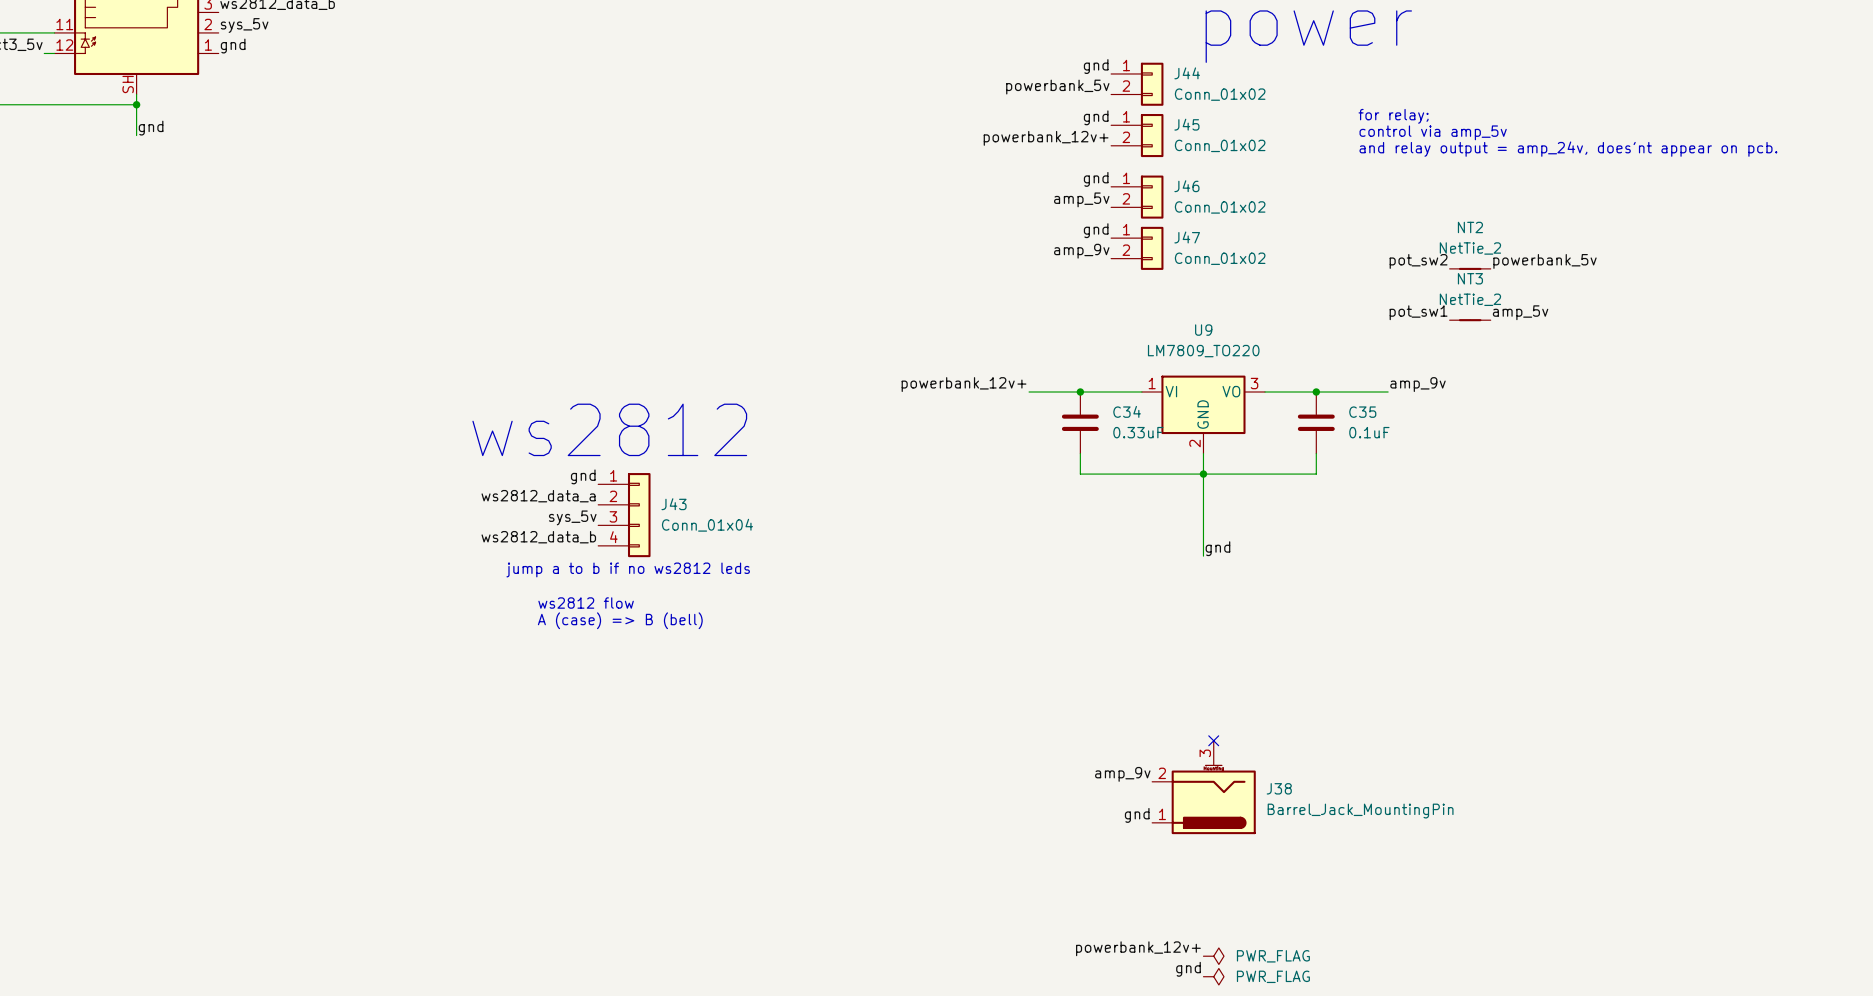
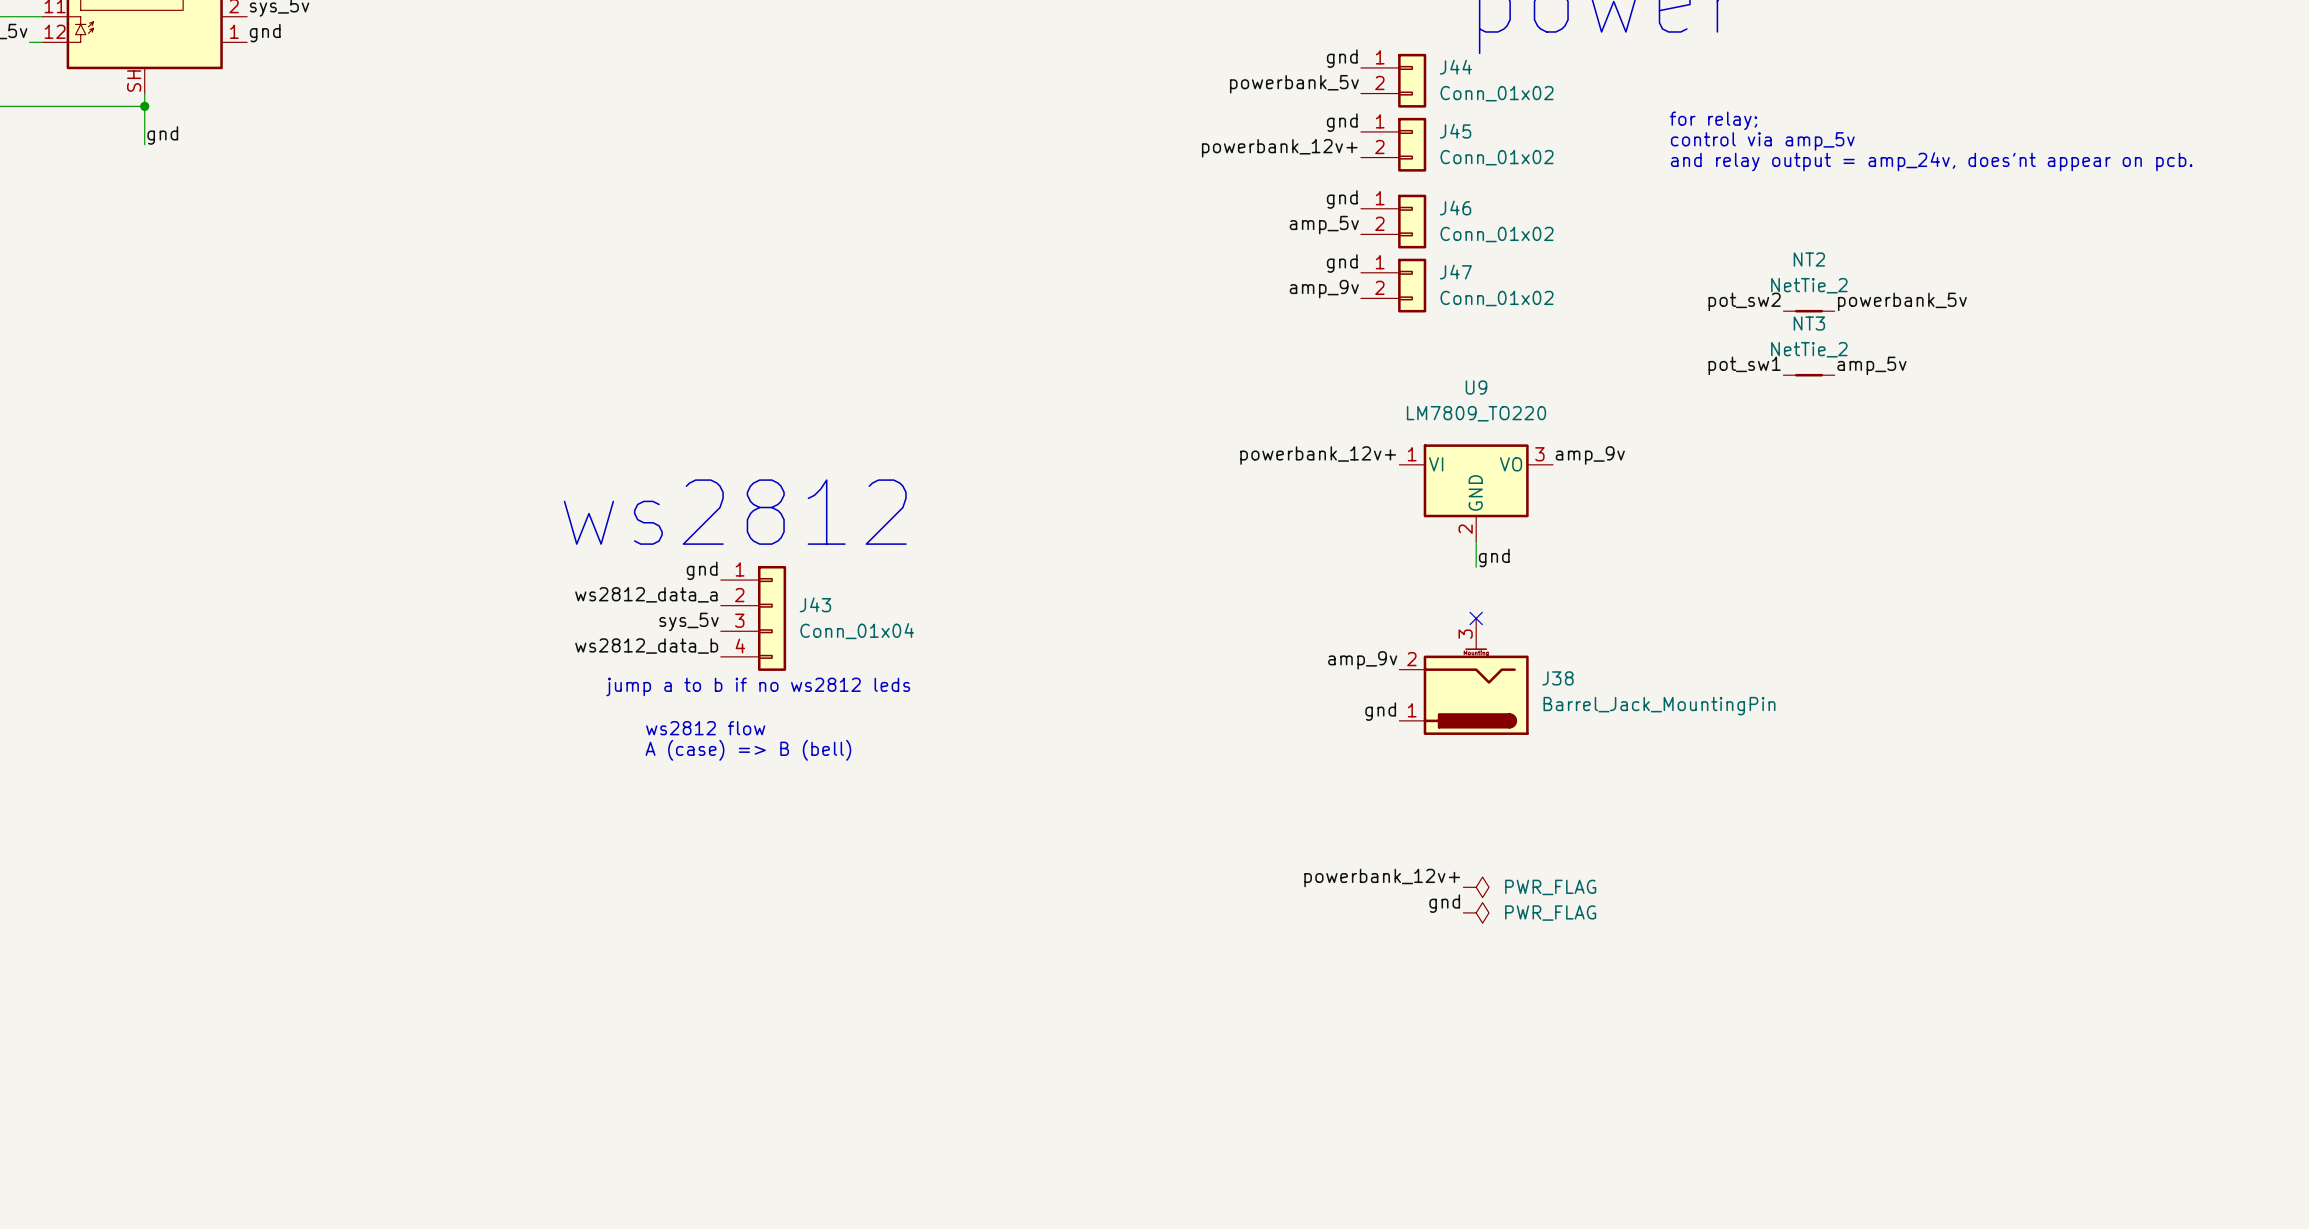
label position: powerbank_12v+ (964, 384) -> powerbank_12v+ (1318, 455)
label position: amp_9v (1417, 384) -> amp_9v (1590, 455)
wire: (1029, 391) (1141, 391) -> none
junction: (1080, 391) -> none
wire: (1265, 391) (1388, 391) -> none
junction: (1316, 391) -> none
C34: 0.33uF (1080, 422) -> none
C35: 0.1uF (1316, 422) -> none
wire: (1080, 453) (1080, 474) (1316, 474) (1316, 453) -> none
label: none -> gnd (1494, 557)
wire: (1203, 474) (1203, 556) -> none
junction: (1203, 474) -> none
no-connect mark: none -> (1476, 618)
label: none -> amp_9v (1362, 660)
label: gnd (1217, 548) -> none
label: none -> gnd (1380, 711)
label: none -> powerbank_12v+ (1382, 878)
power symbol: none -> PWR_FLAG (1476, 887)
no-connect mark: (1213, 740) -> none
power symbol: none -> PWR_FLAG (1476, 912)
label: amp_9v (1122, 774) -> none
J38 position: (1203, 787) -> (1464, 676)
label position: gnd (1137, 815) -> gnd (1444, 903)
label: powerbank_12v+ (1138, 948) -> none
power symbol: PWR_FLAG (1213, 956) -> none
label: gnd (1188, 969) -> none
power symbol: PWR_FLAG (1213, 976) -> none

